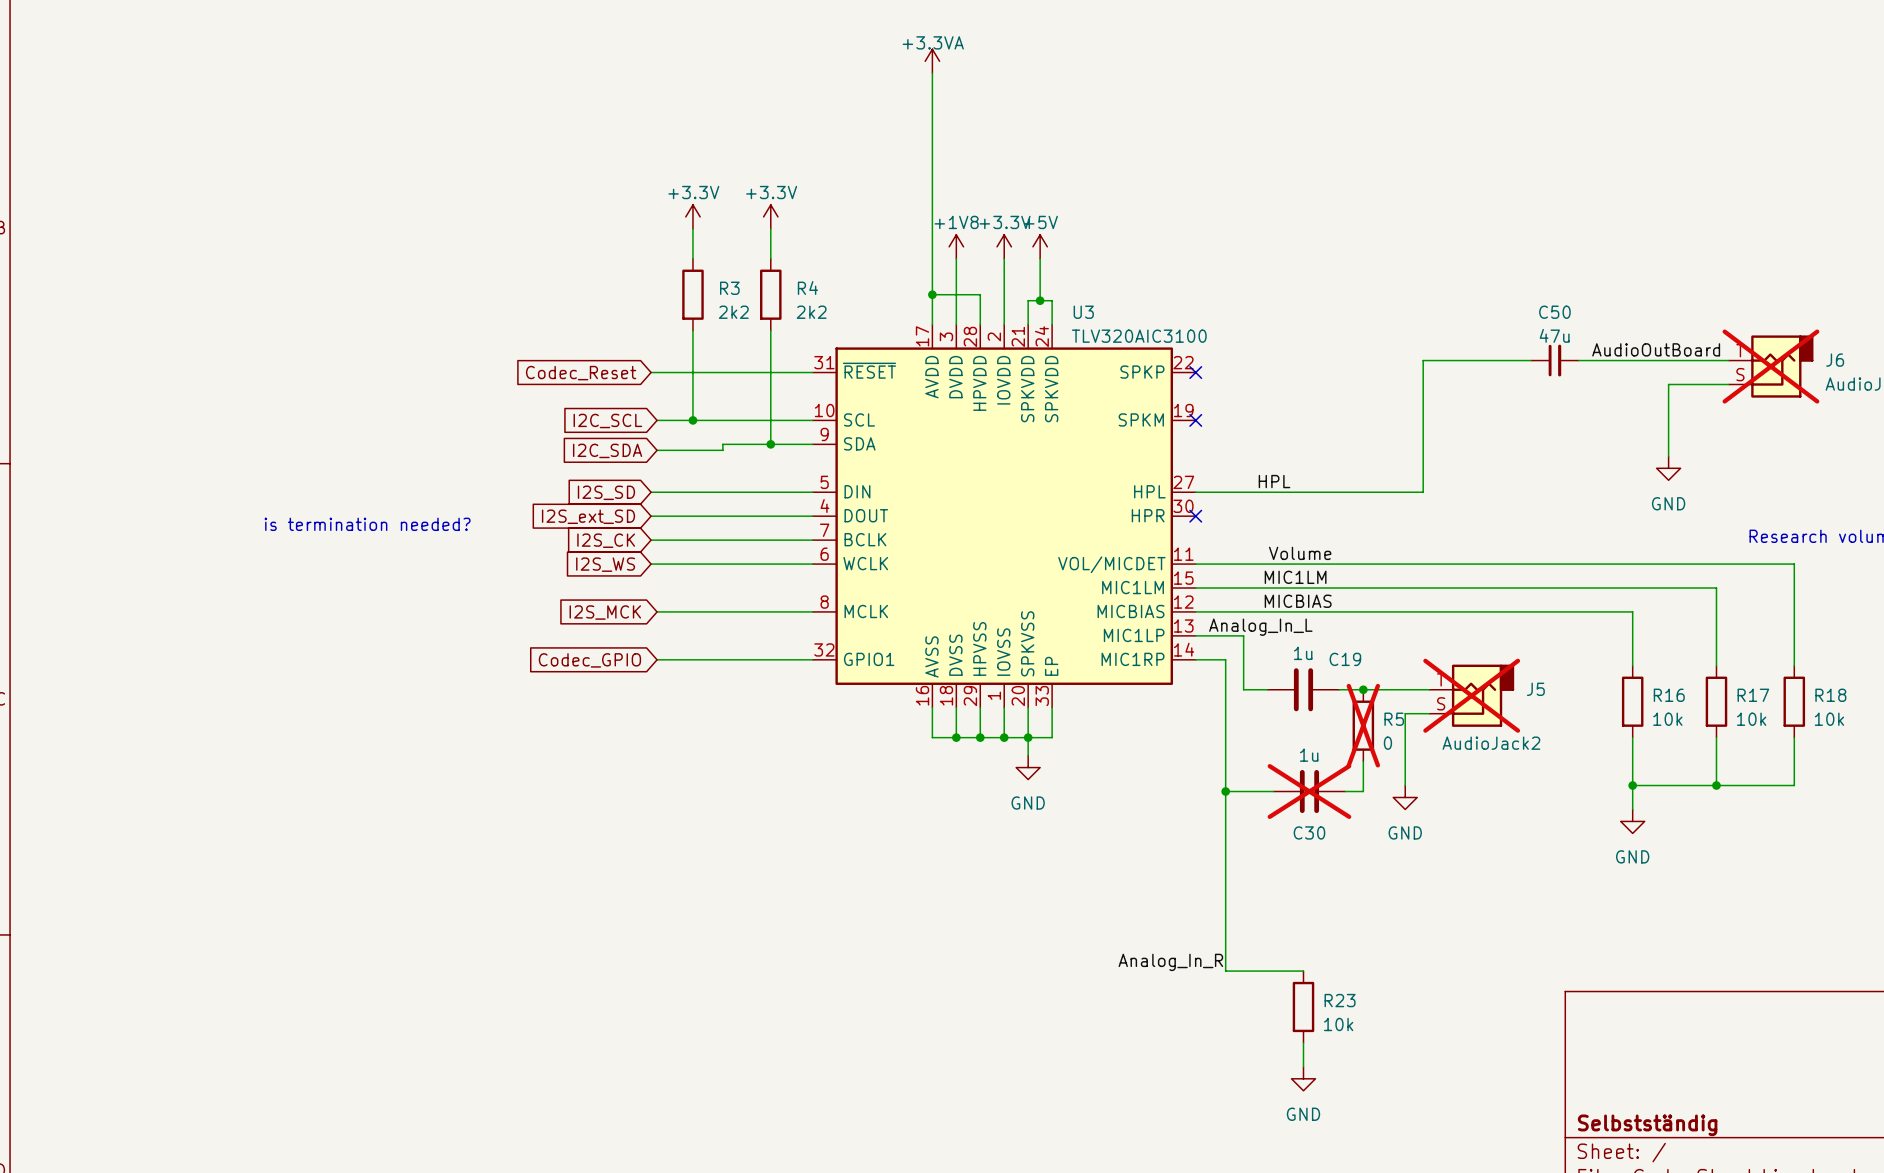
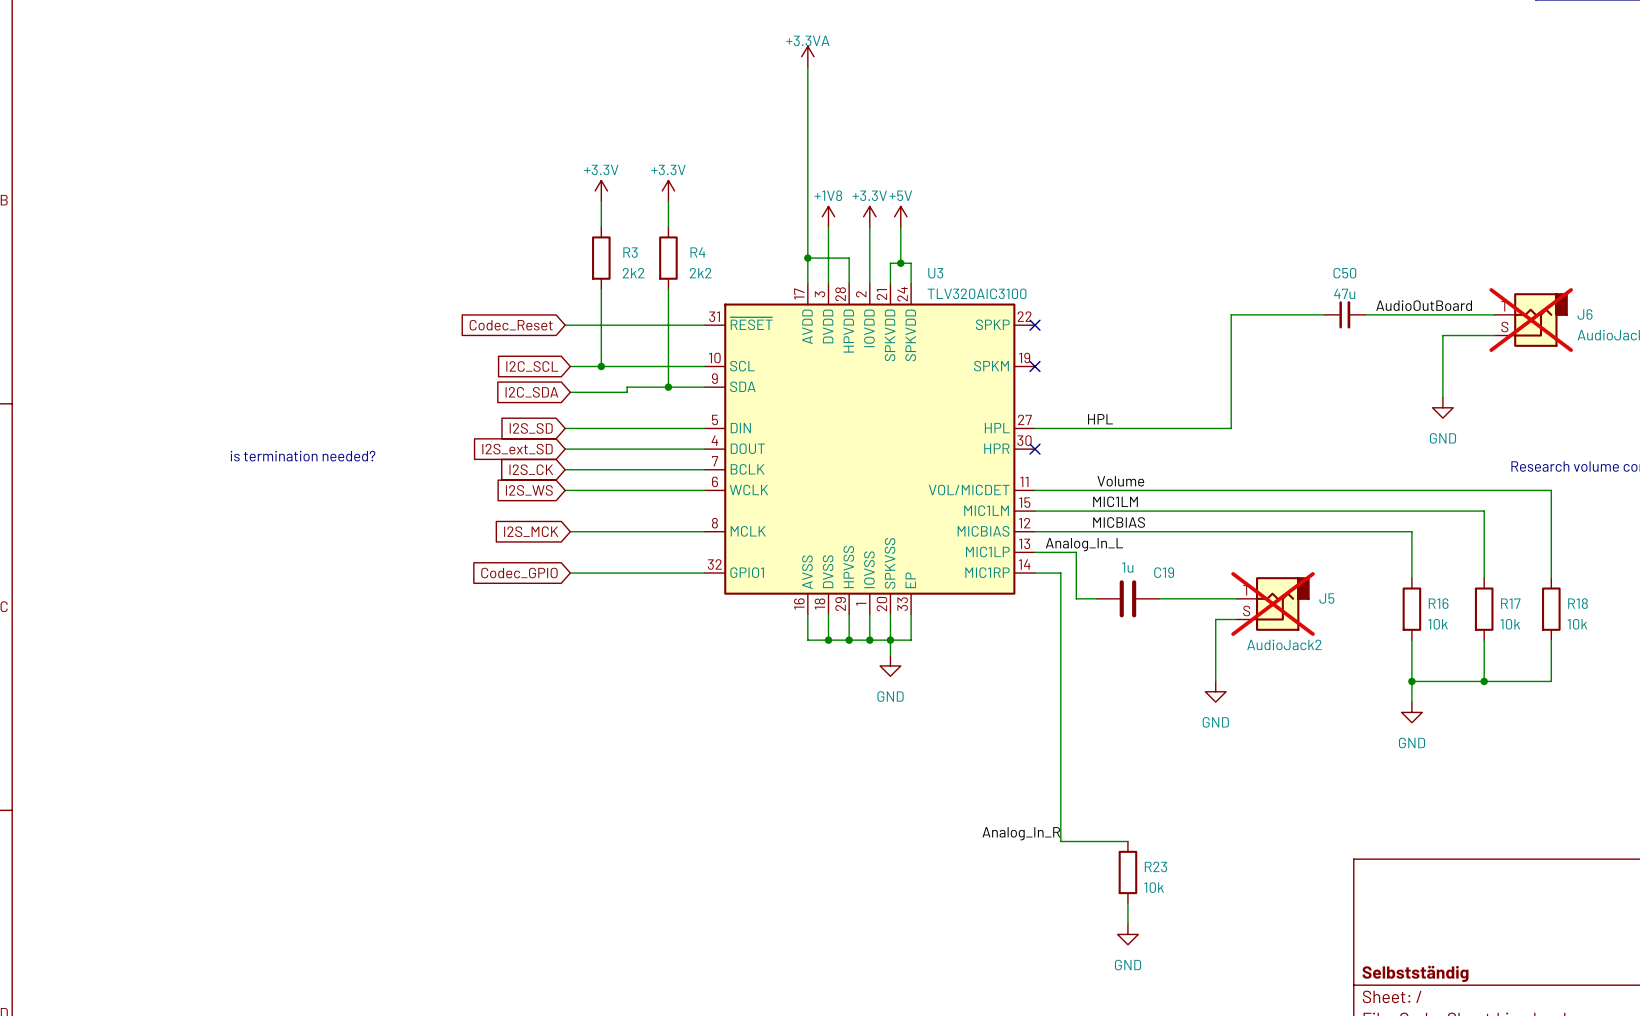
junction: (1363, 689) -> none
R5: 0 (1363, 725) -> none
wire: (1363, 761) (1363, 791) (1345, 791) -> none
wire: (1225, 791) (1273, 791) -> none
junction: (1225, 791) -> none
C30: 1u (1309, 791) -> none

